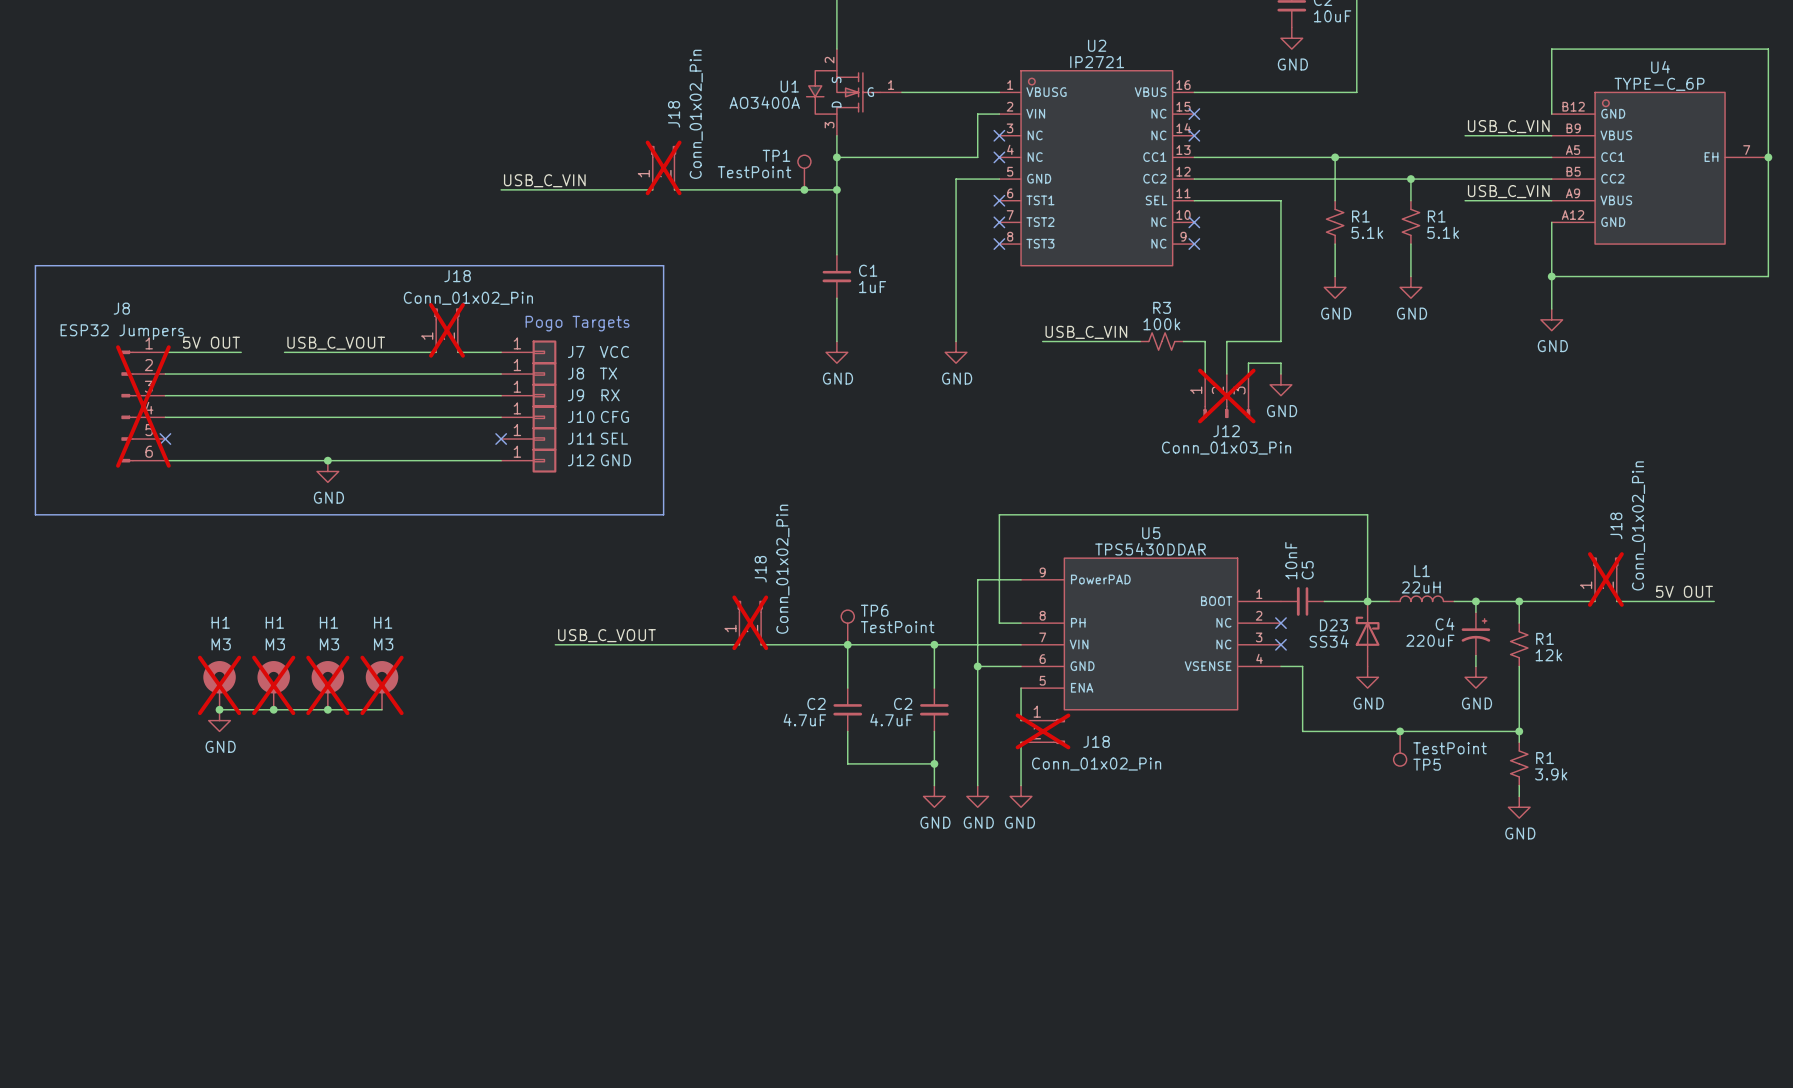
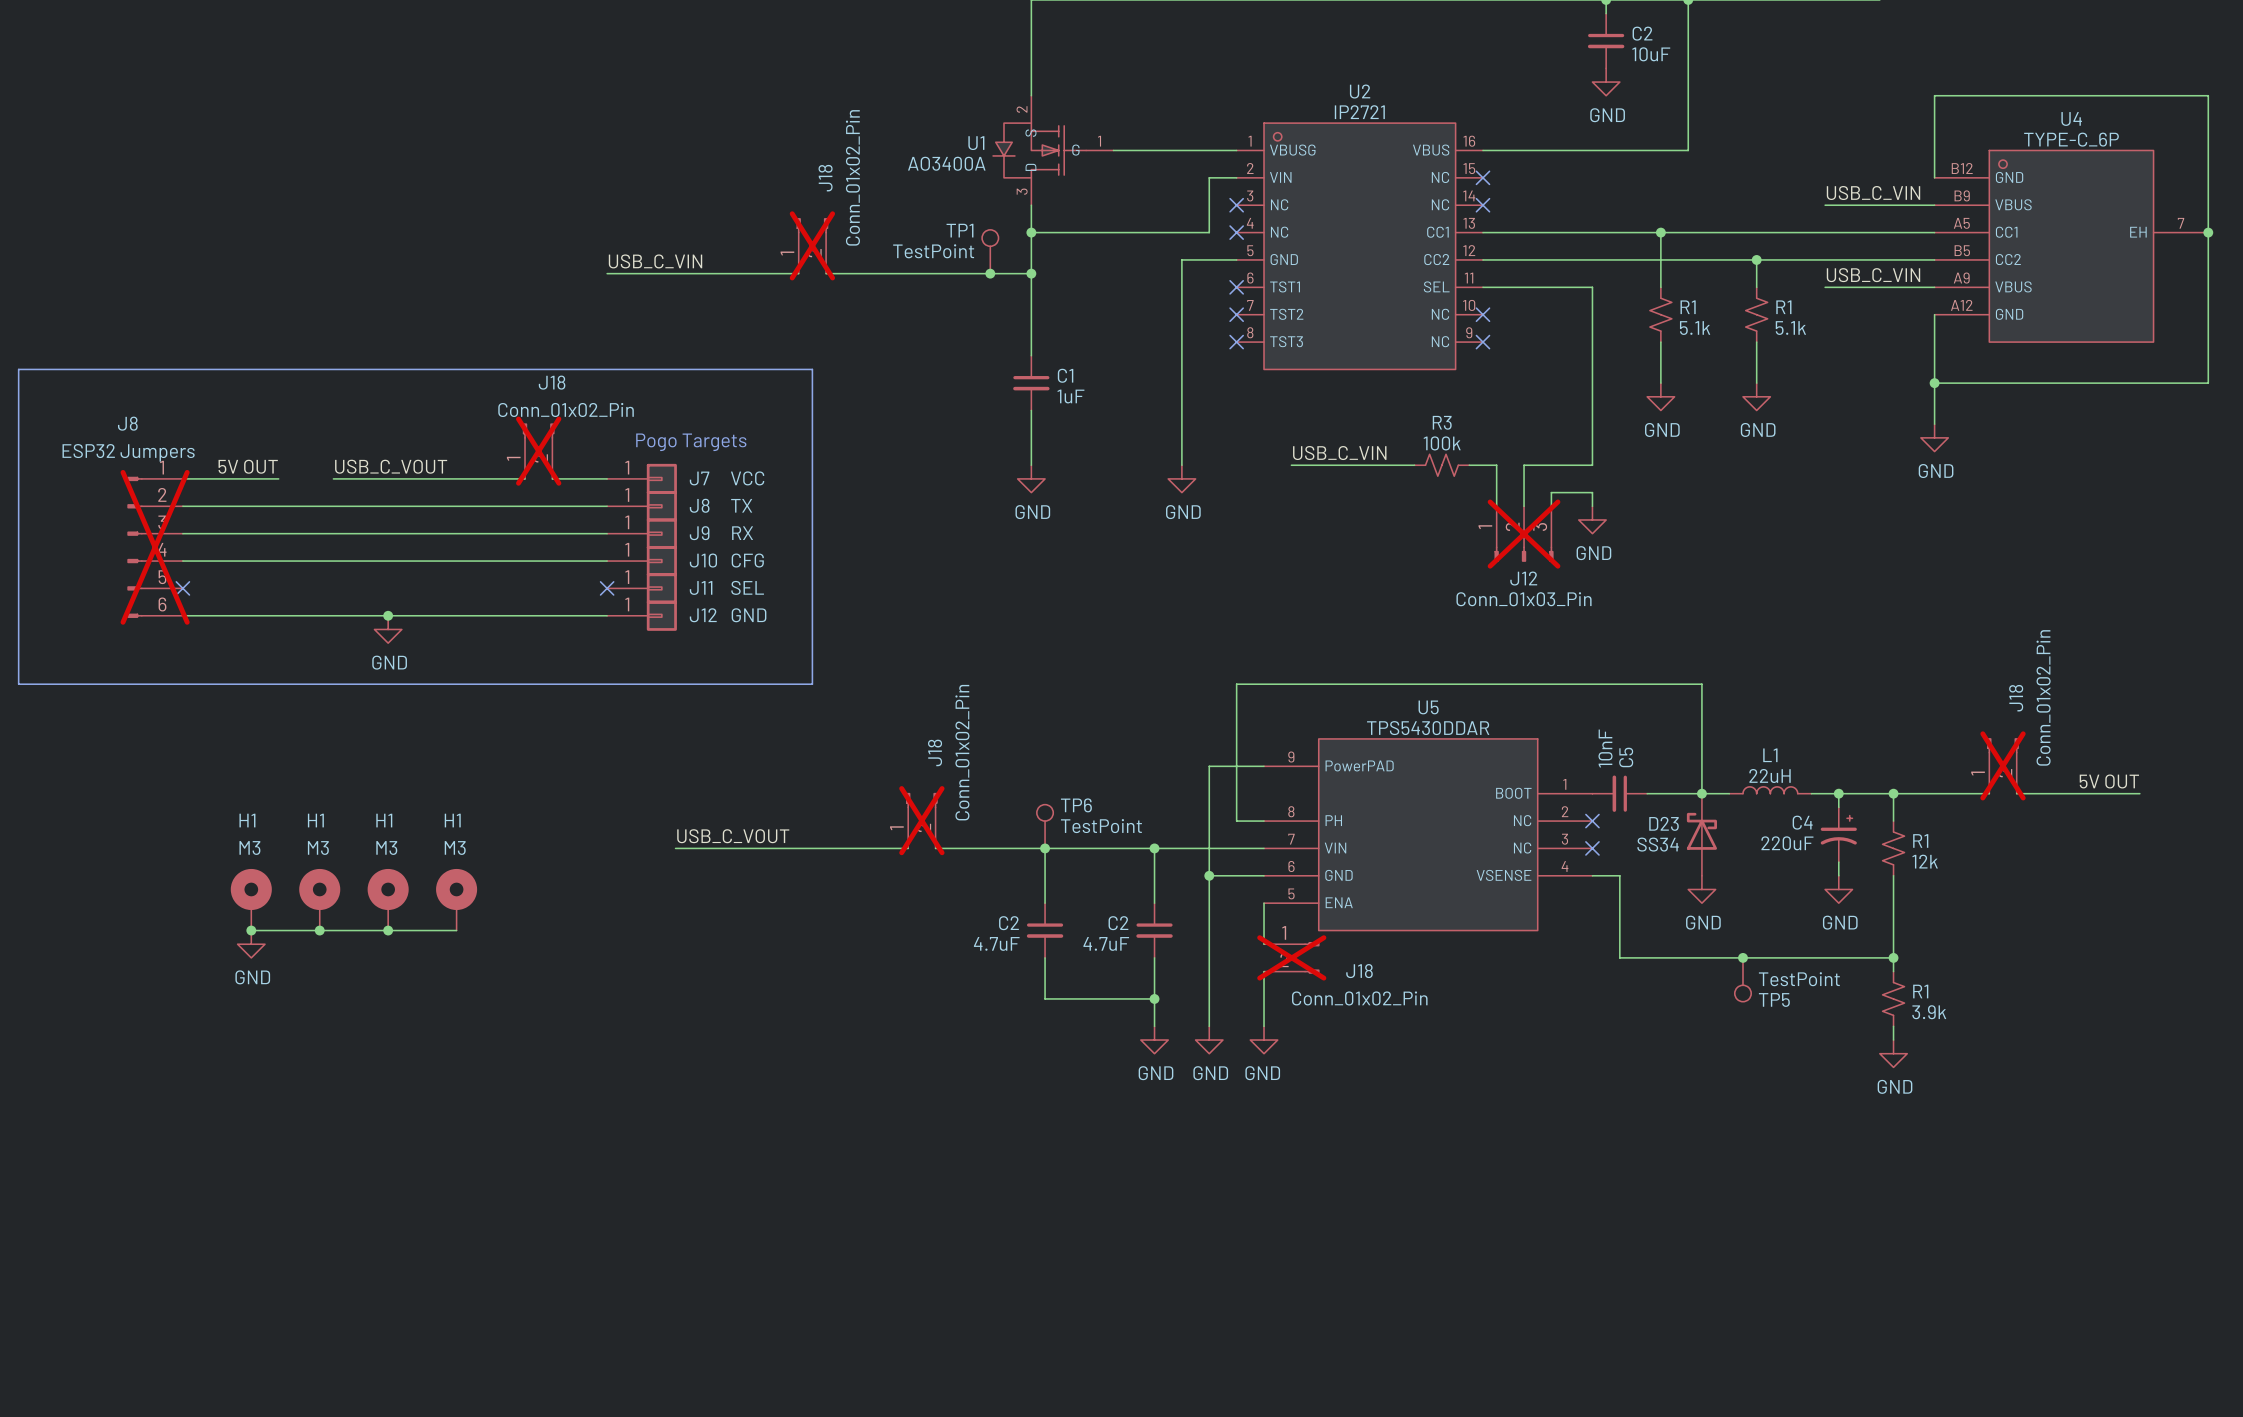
H1 do-not-place cross: (219, 685) -> none
H1 do-not-place cross: (273, 685) -> none
H1 do-not-place cross: (327, 685) -> none
H1 do-not-place cross: (382, 685) -> none

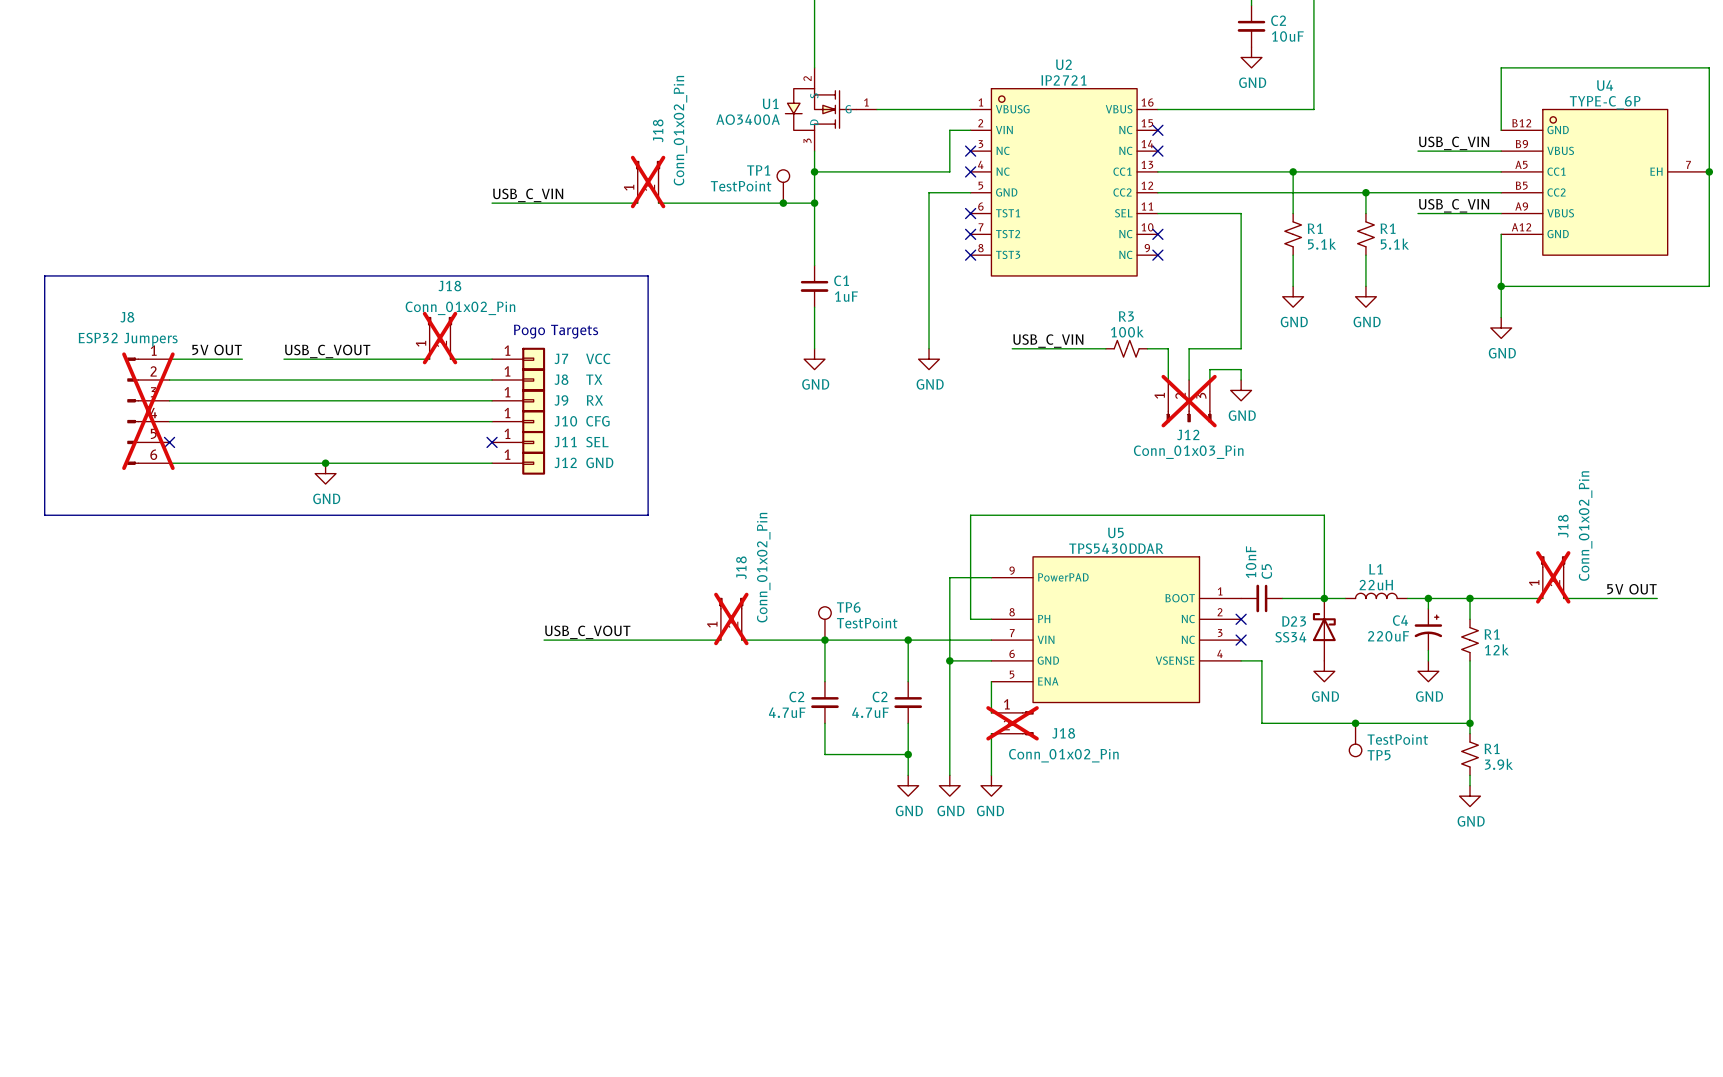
H1: M3 (251, 899) -> none
H1: M3 (319, 899) -> none
H1: M3 (388, 899) -> none
H1: M3 (456, 899) -> none
wire: (251, 930) (456, 930) -> none
junction: (251, 930) -> none
junction: (319, 930) -> none
junction: (388, 930) -> none
power symbol: GND (251, 944) -> none

